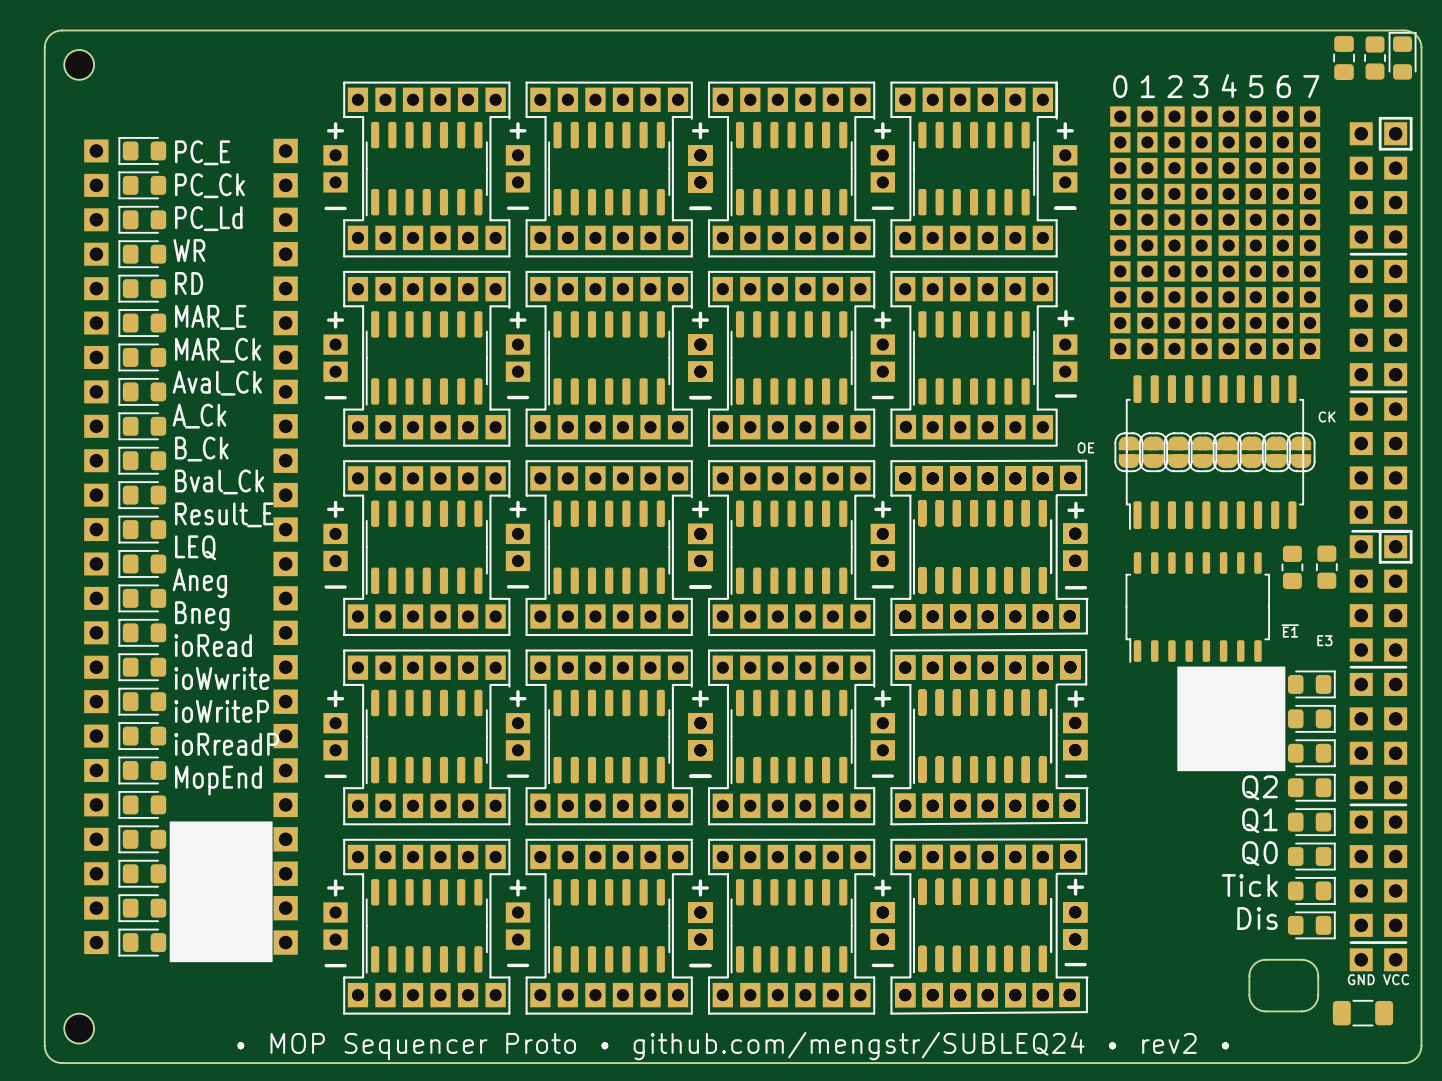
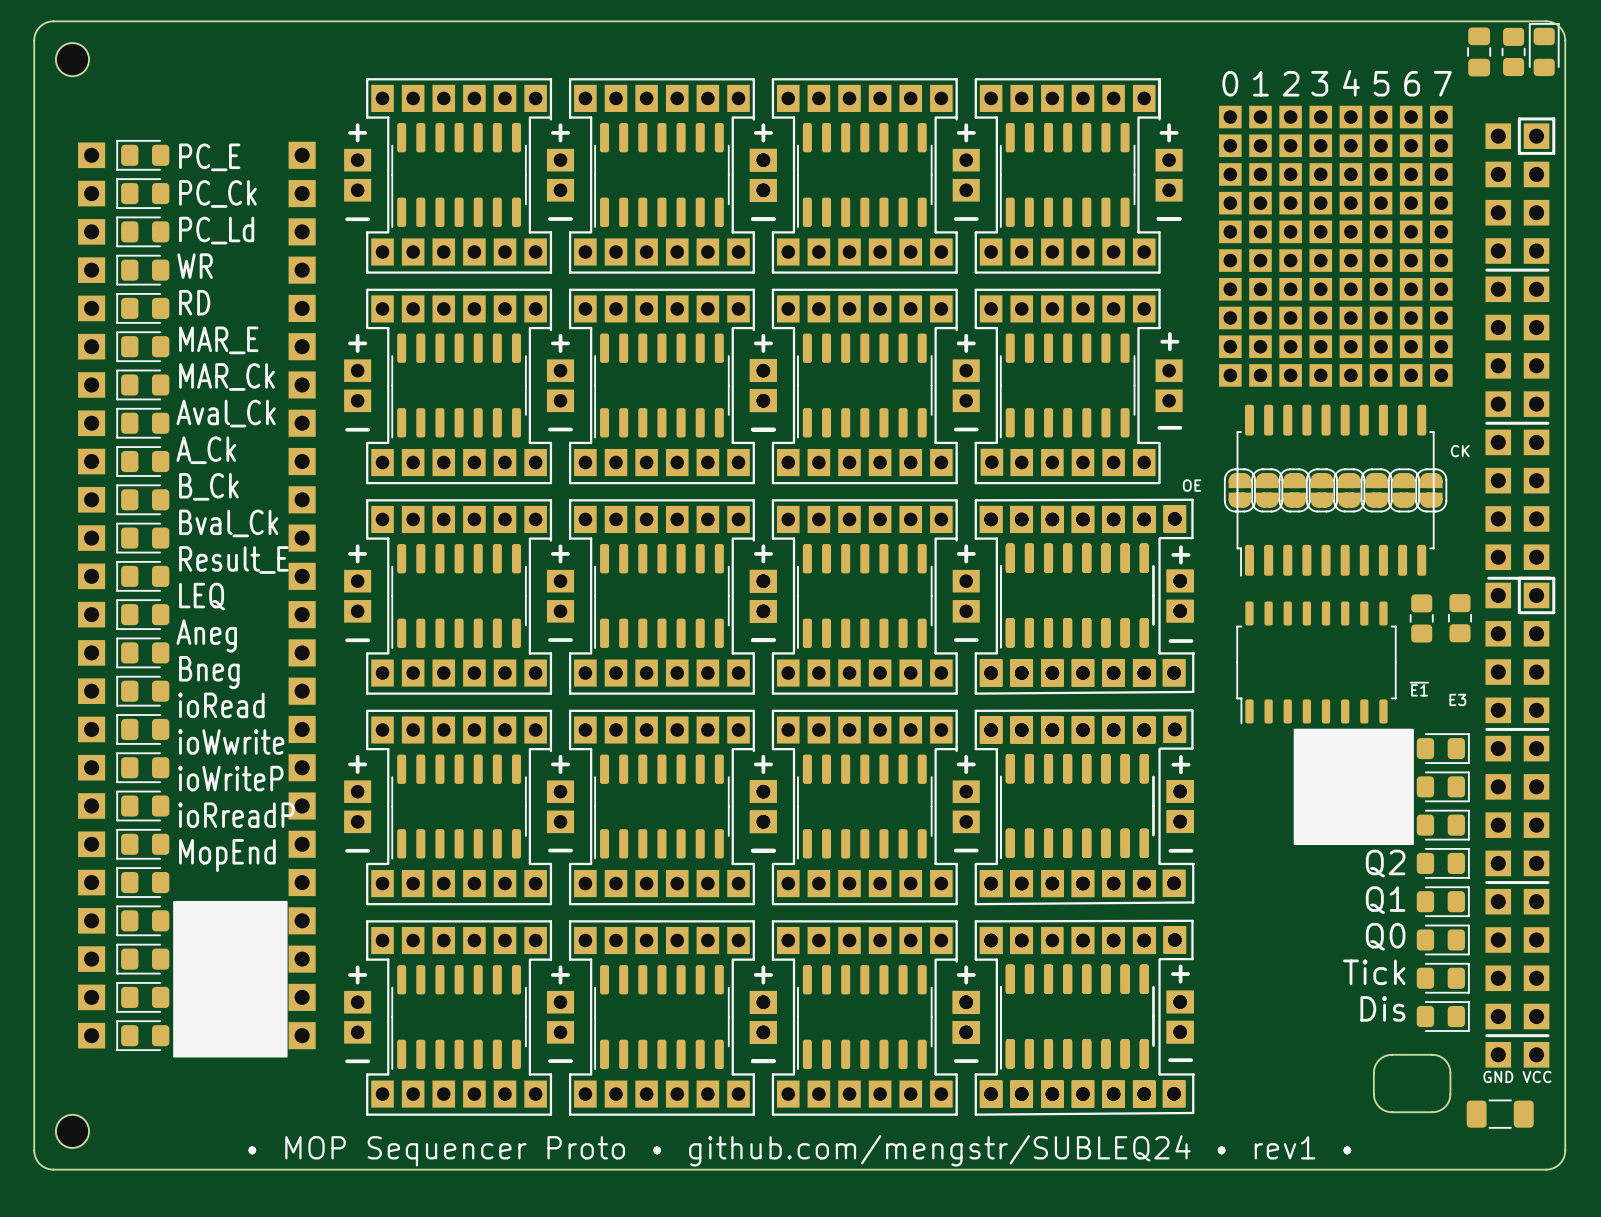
text: • MOP Sequencer Proto • github.com/mengstr/SUBLEQ24 • rev2 • (733, 1046) -> • MOP Sequencer Proto • github.com/mengstr/SUBLEQ24 • rev1 • (799, 1150)

